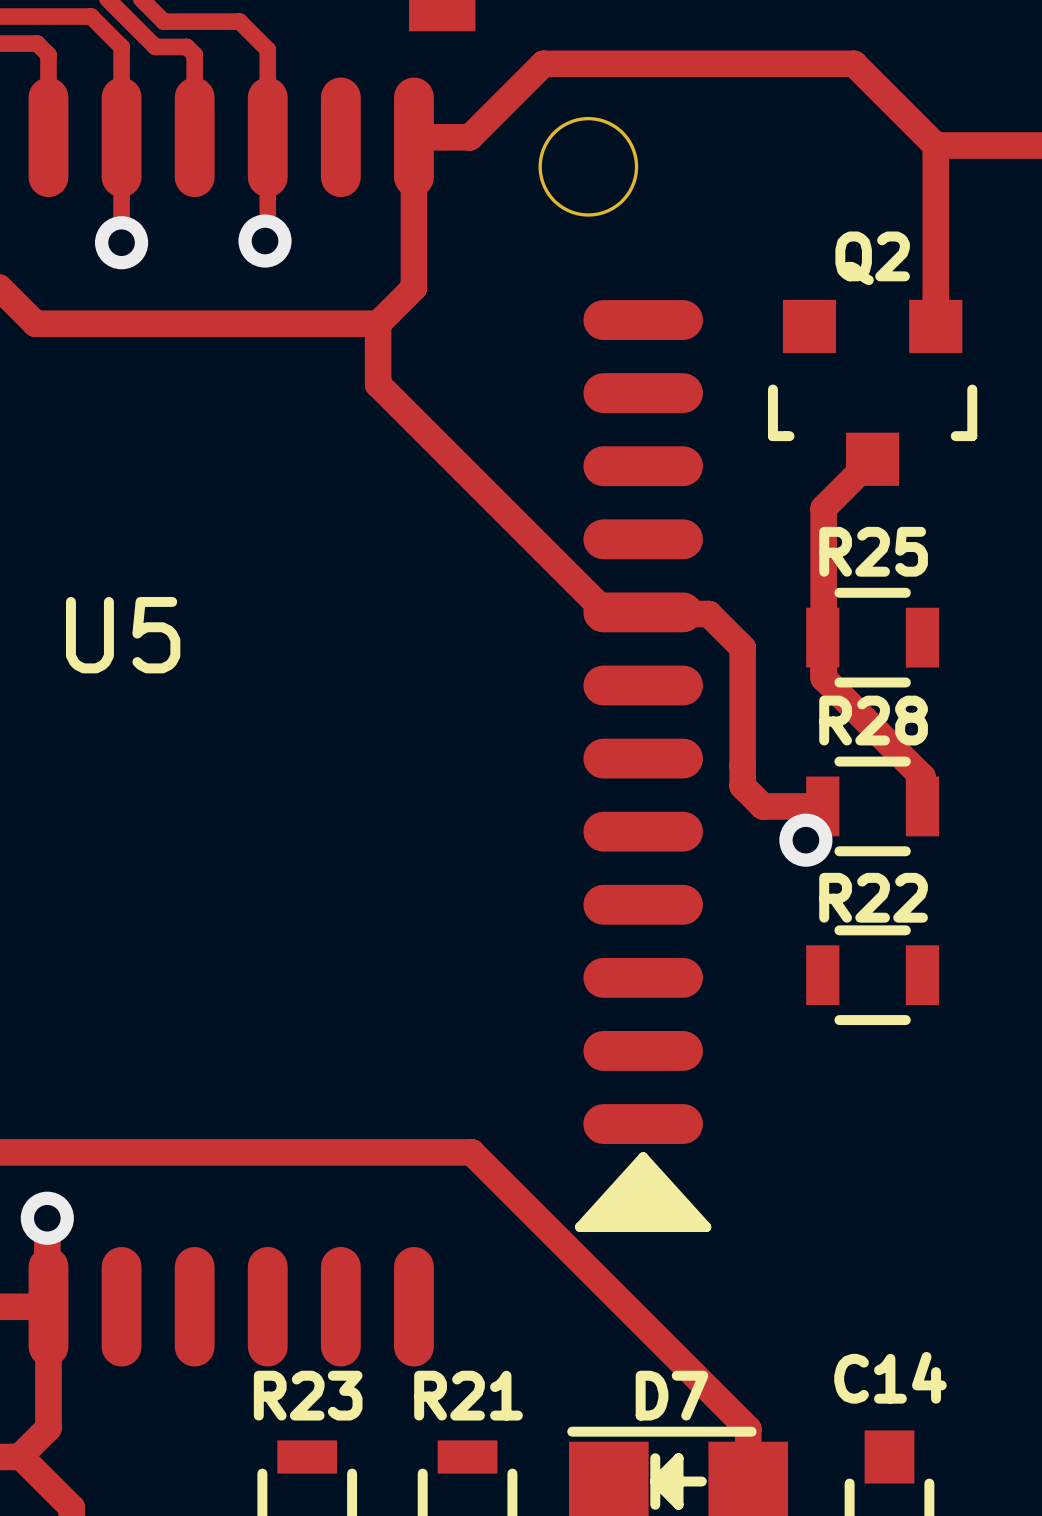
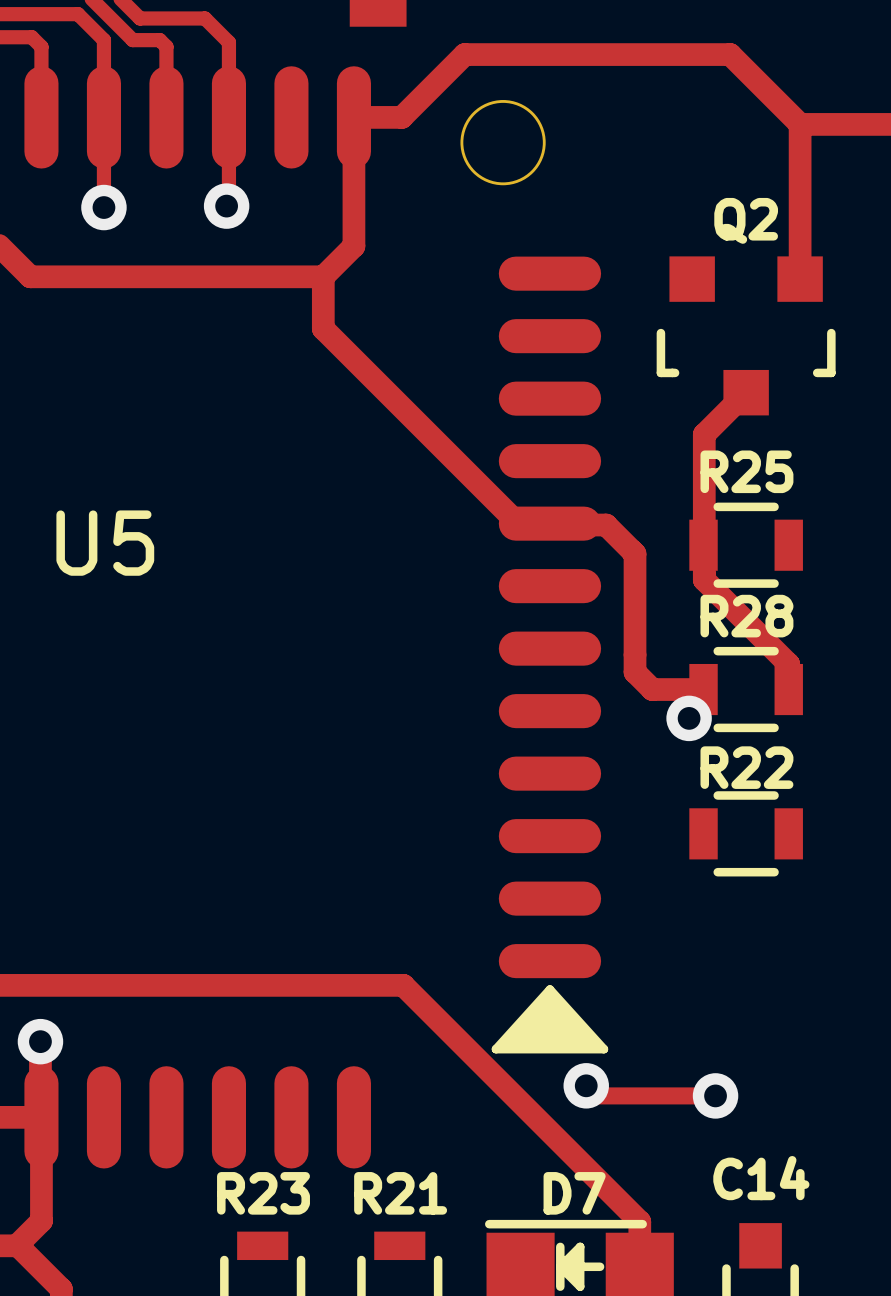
track: none -> (586, 1085) (596, 1095) (715, 1095)
via: none -> (586, 1085)
via: none -> (715, 1095)

